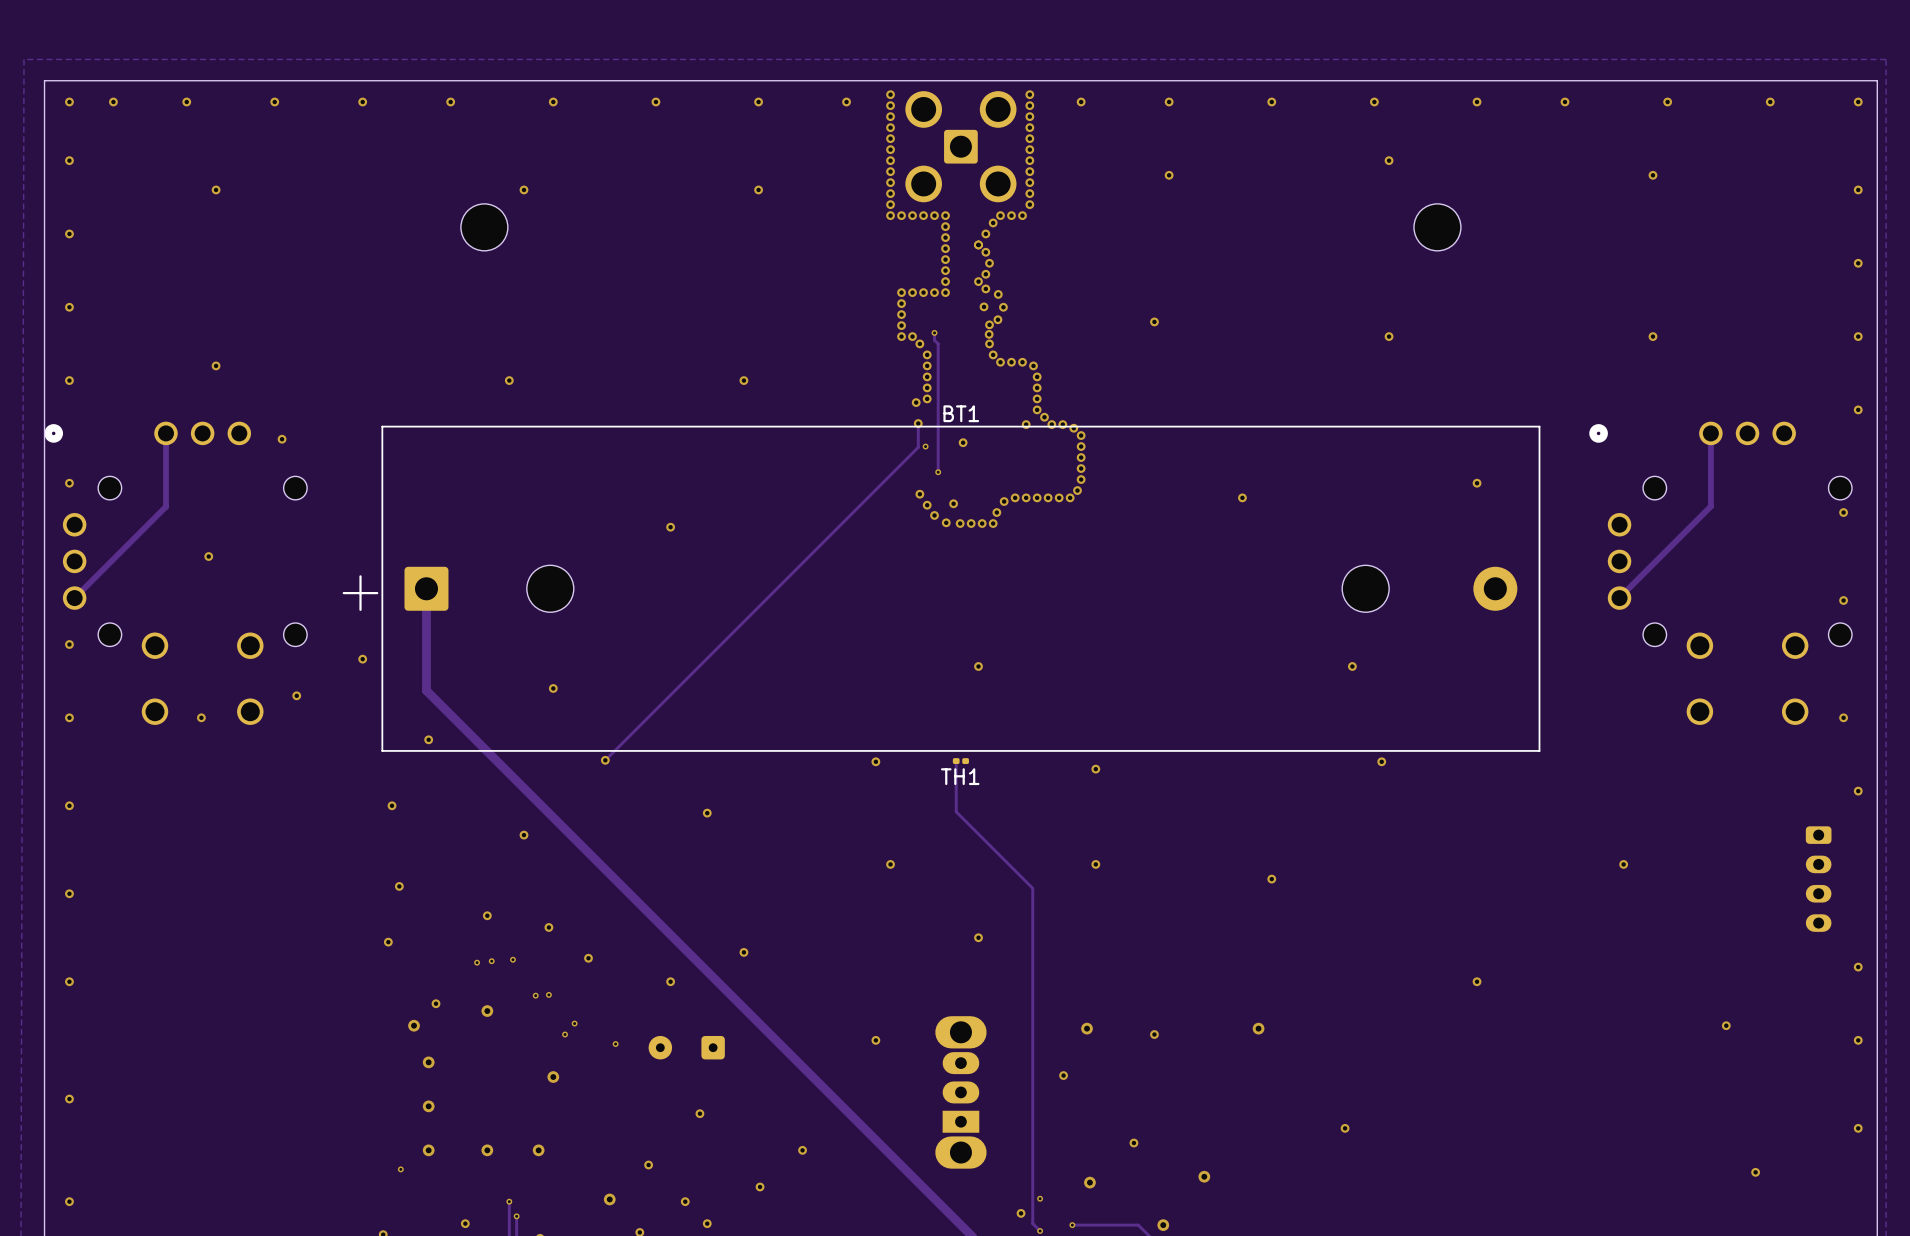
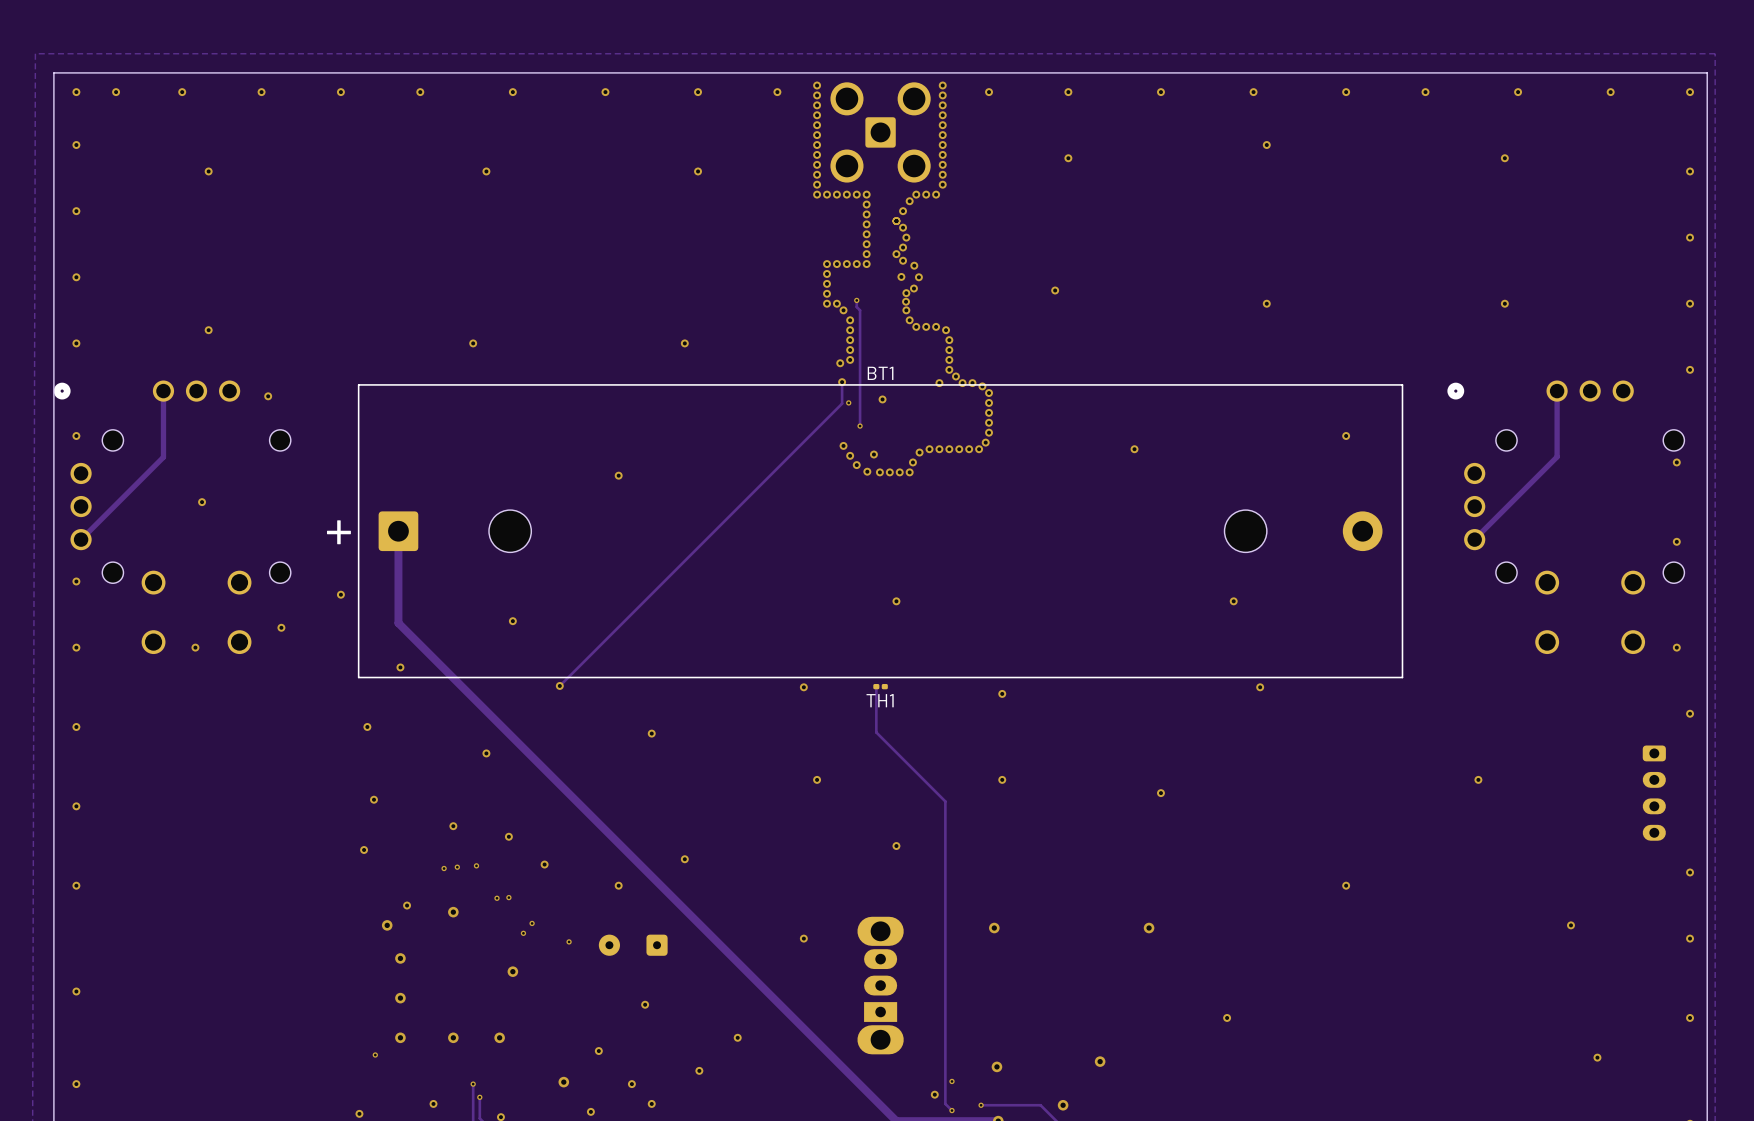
part: (484, 227) -> none
part: (1437, 227) -> none
via: (1154, 1034) -> none
via: (1063, 1075) -> none
via: (1133, 1143) -> none

